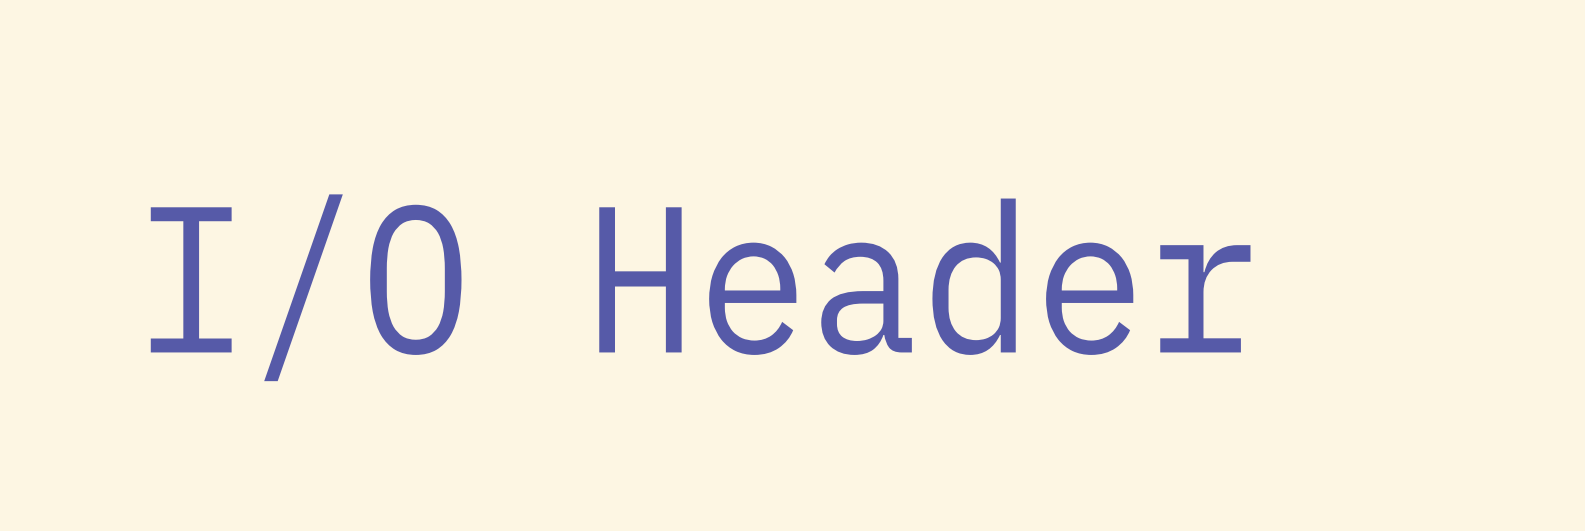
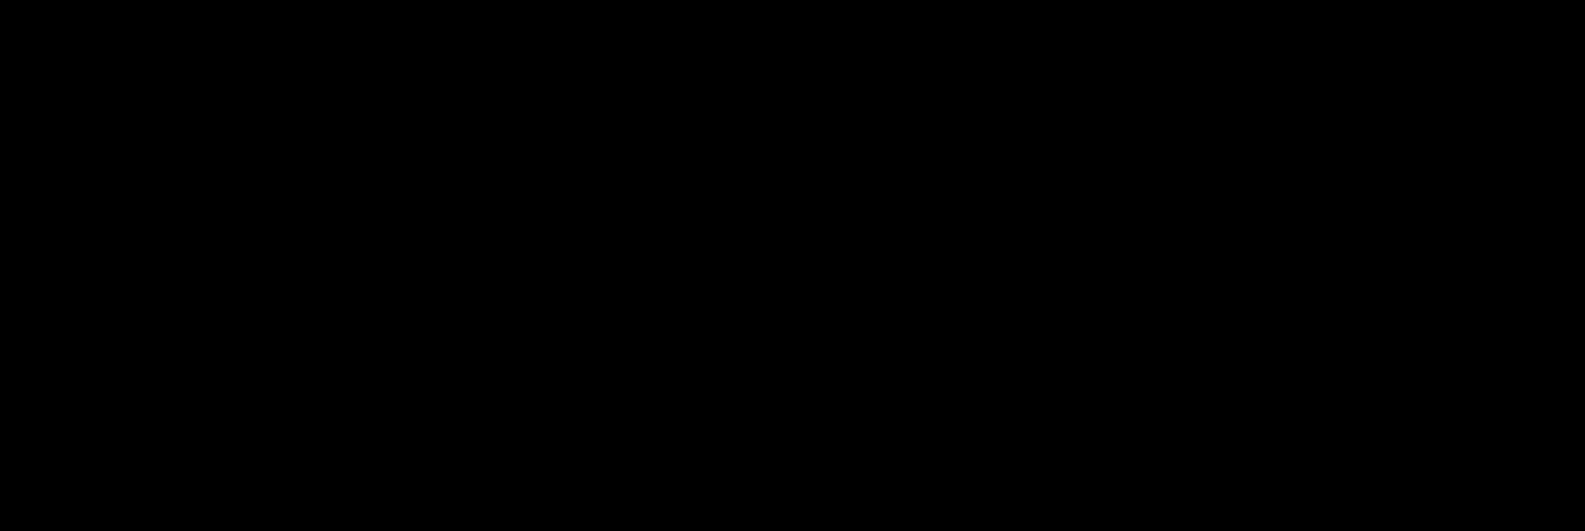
text: I/O Header (700, 287) -> none

